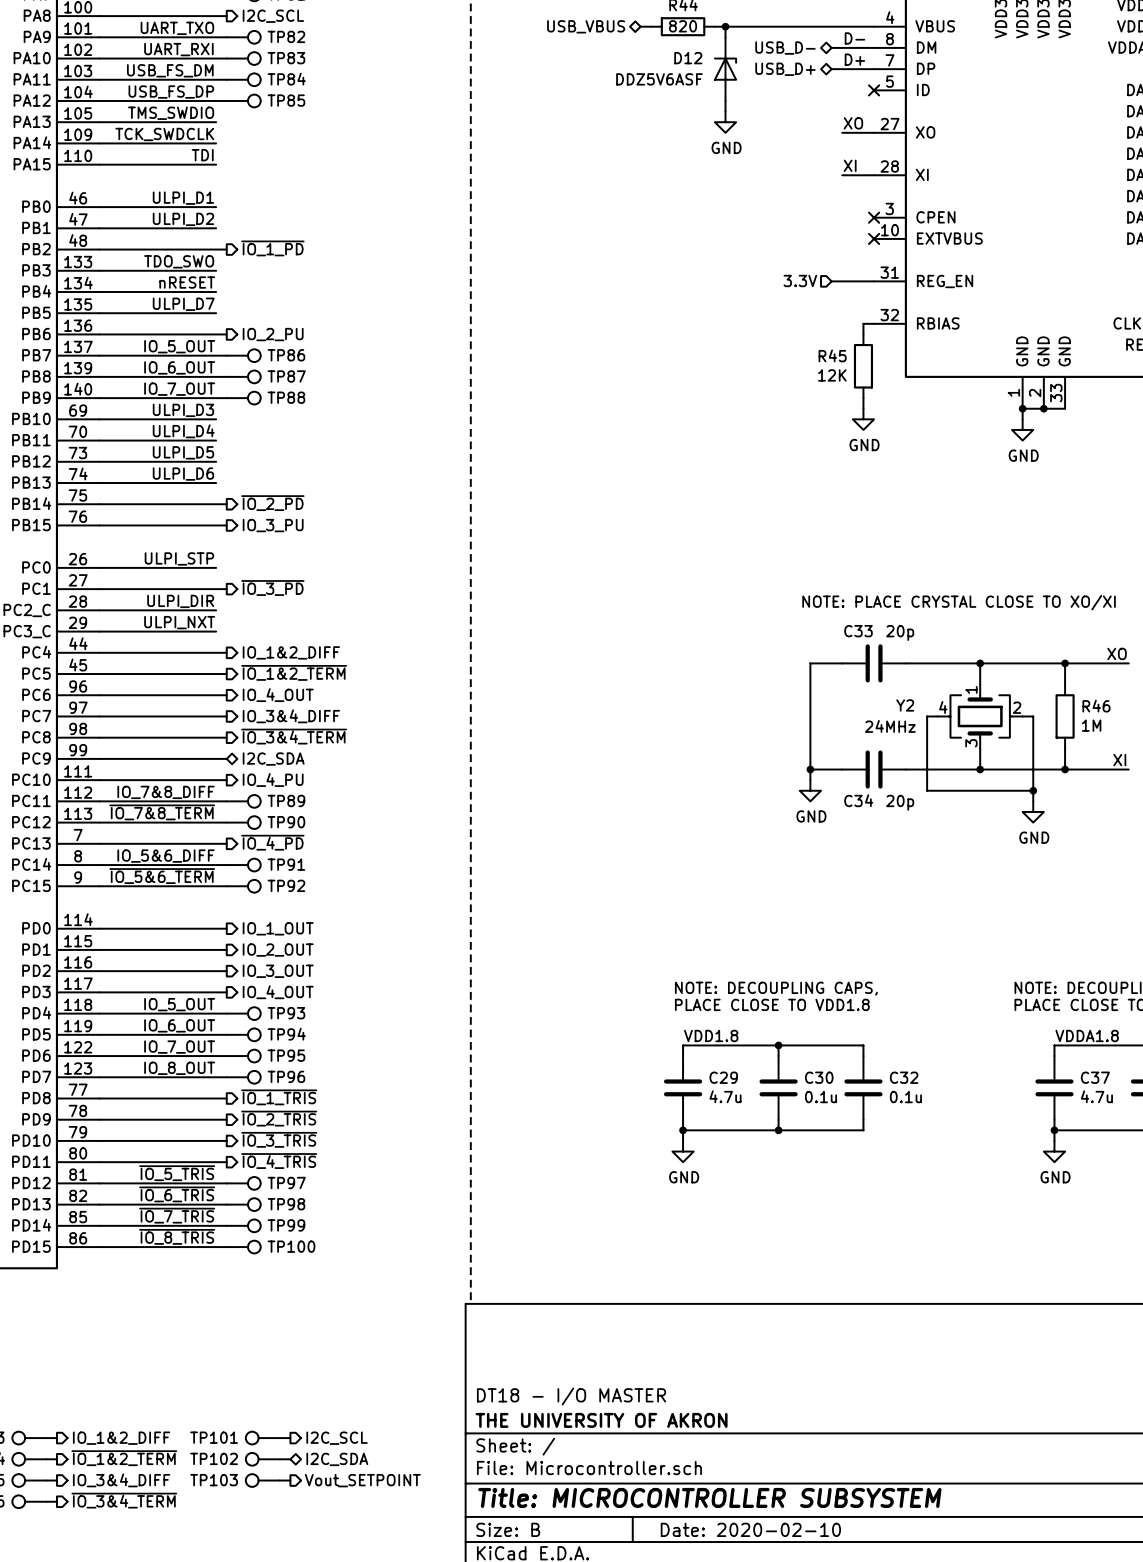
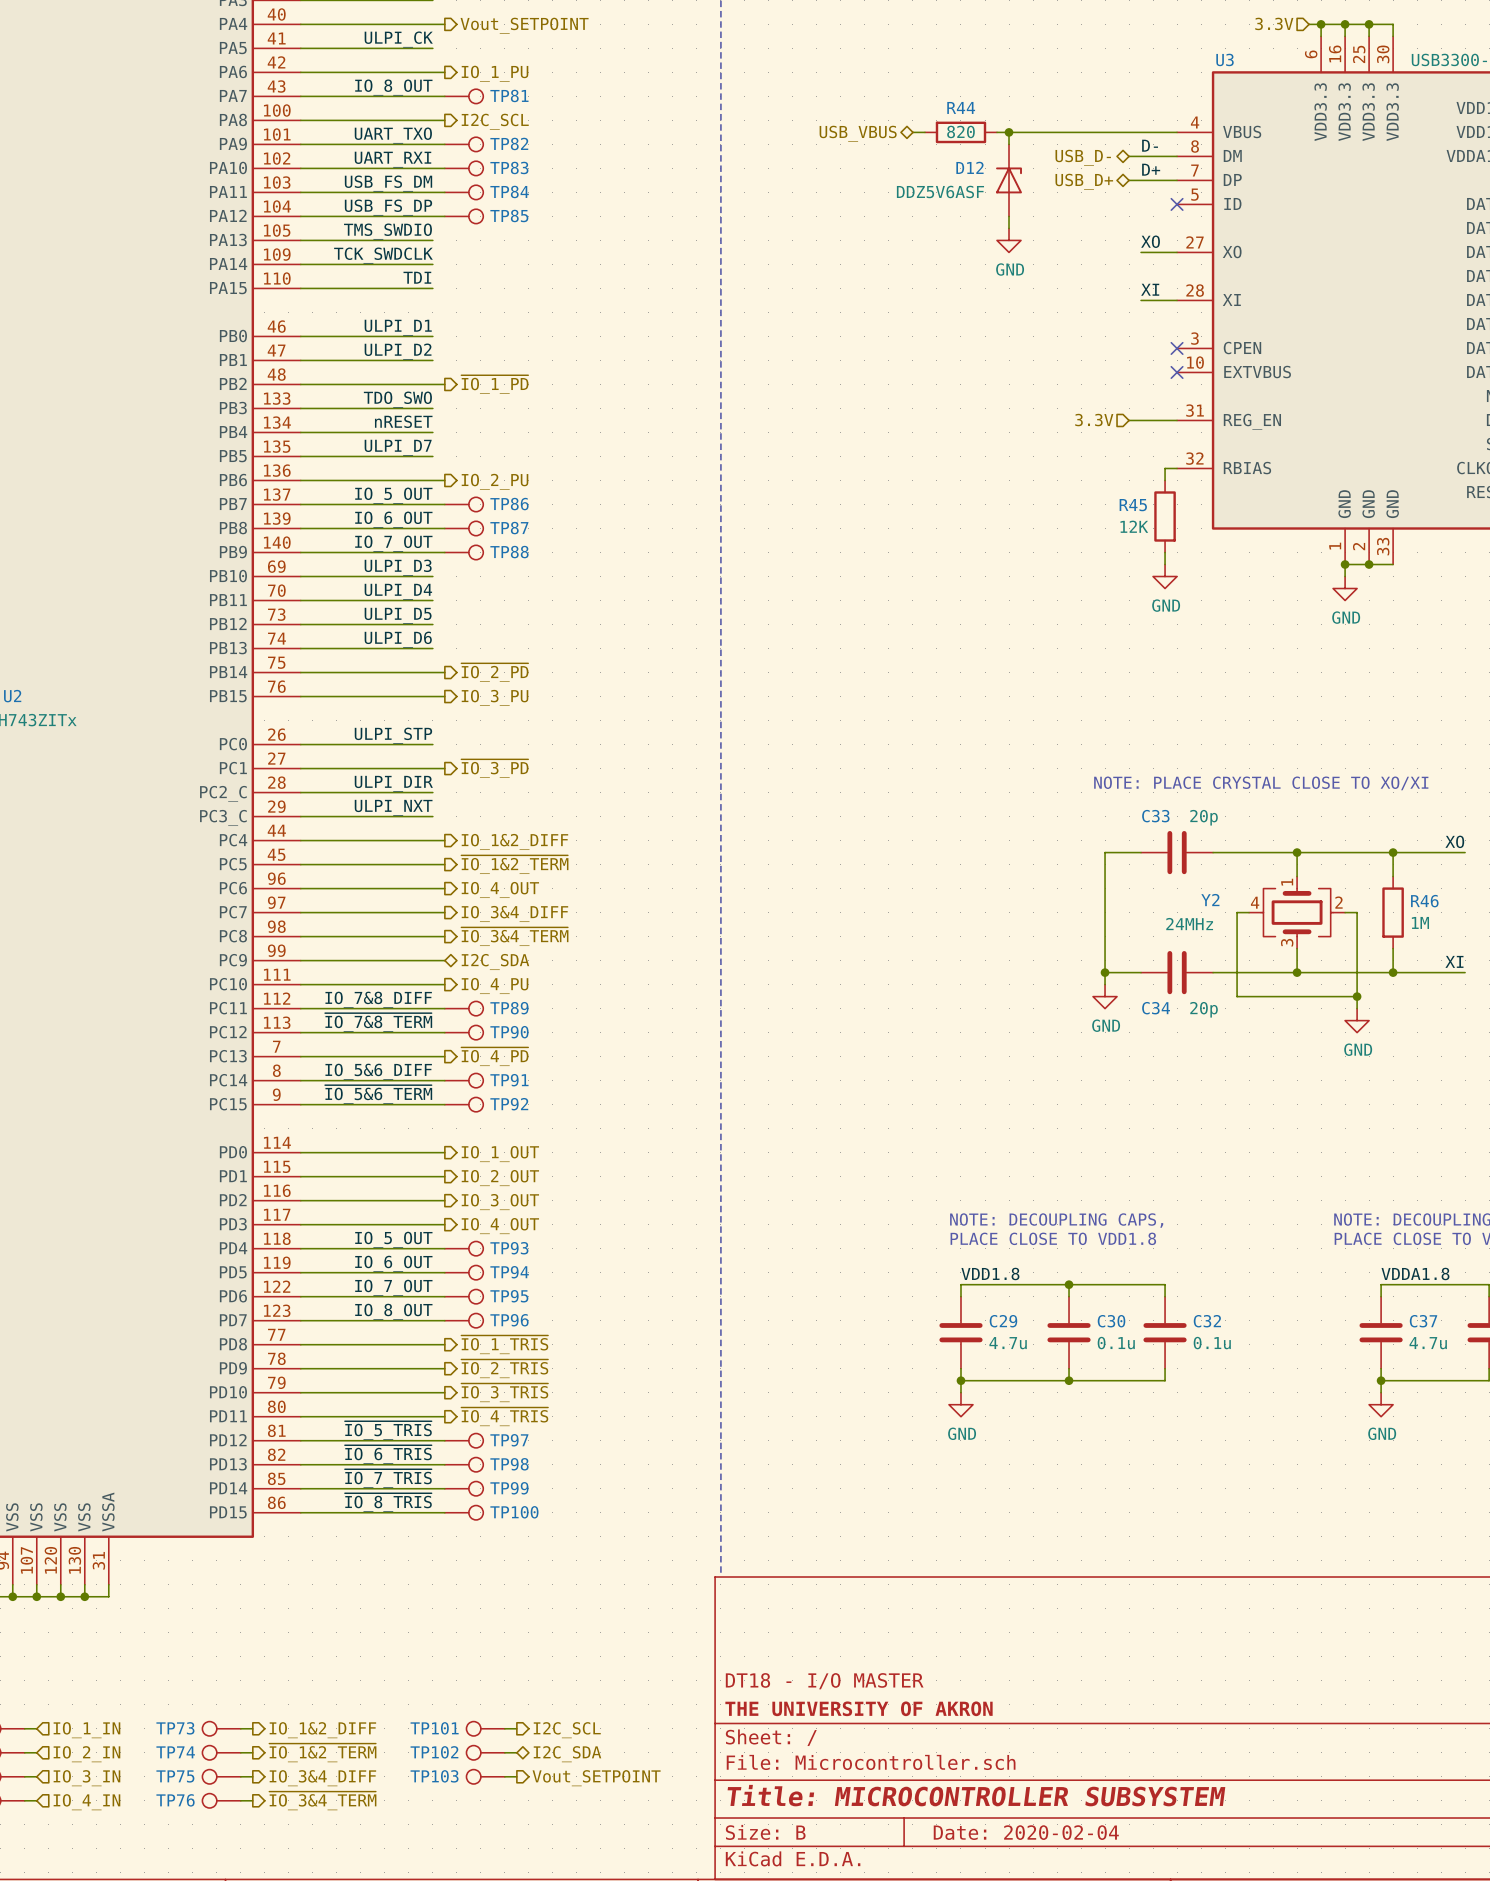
title block: Date: 2020-02-10 (750, 1529) -> Date: 2020-02-04 (1026, 1832)

